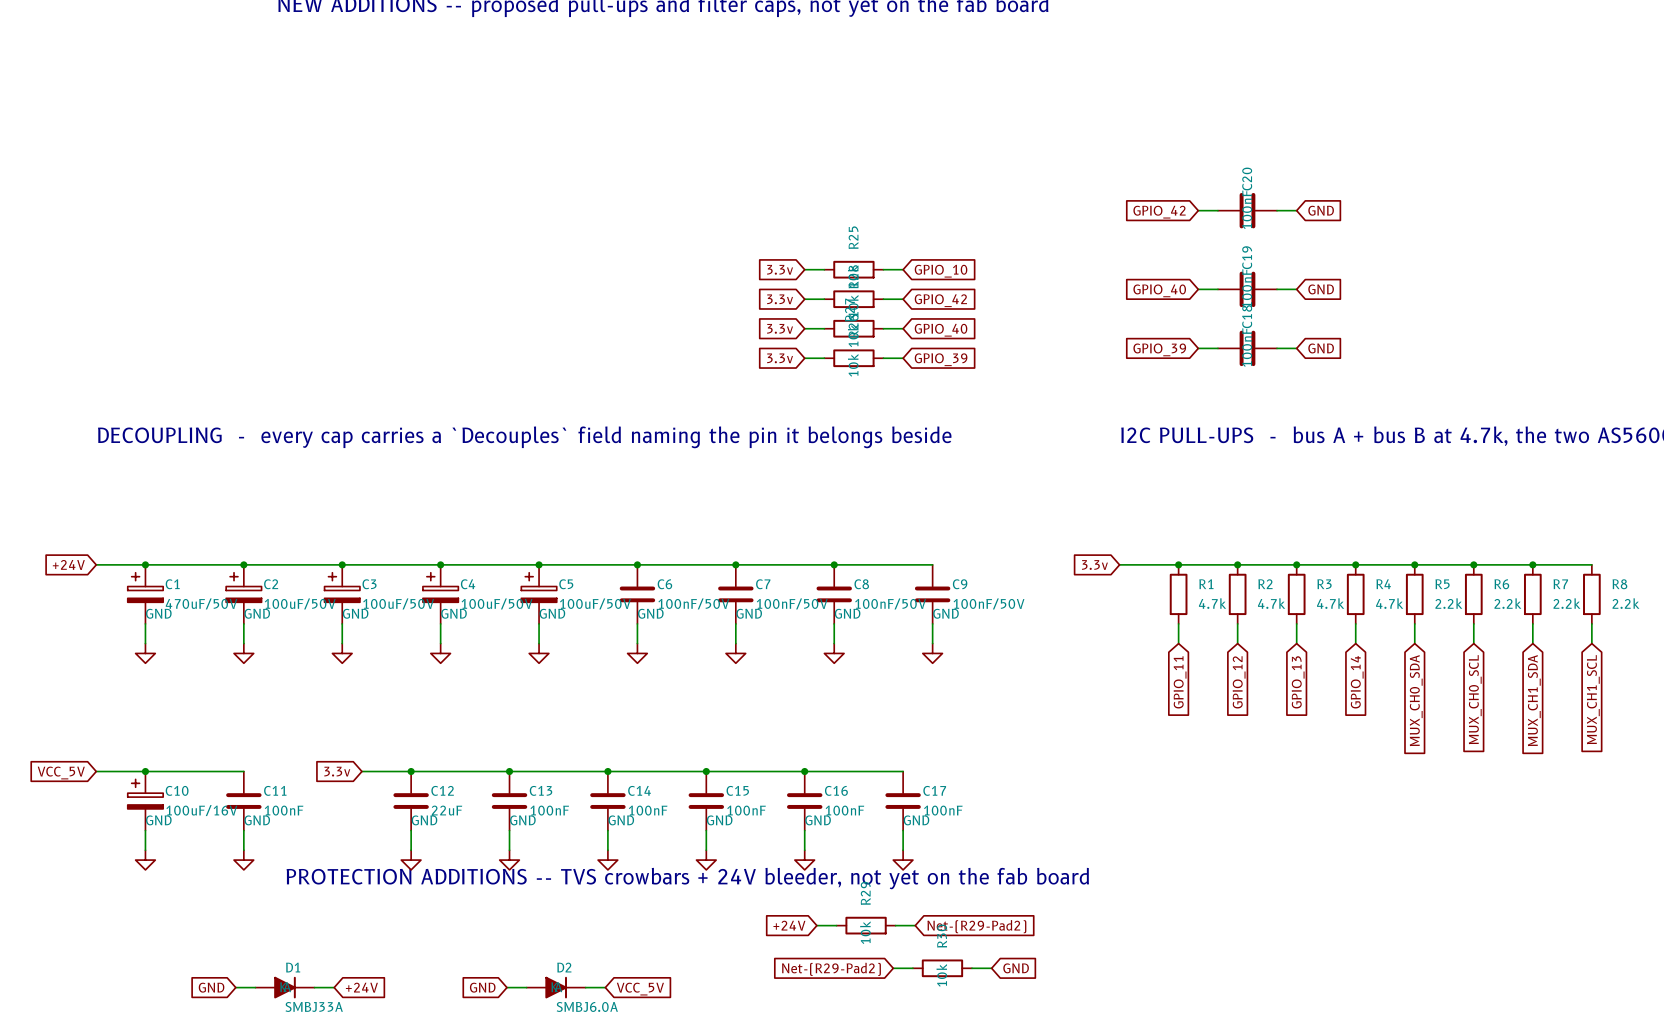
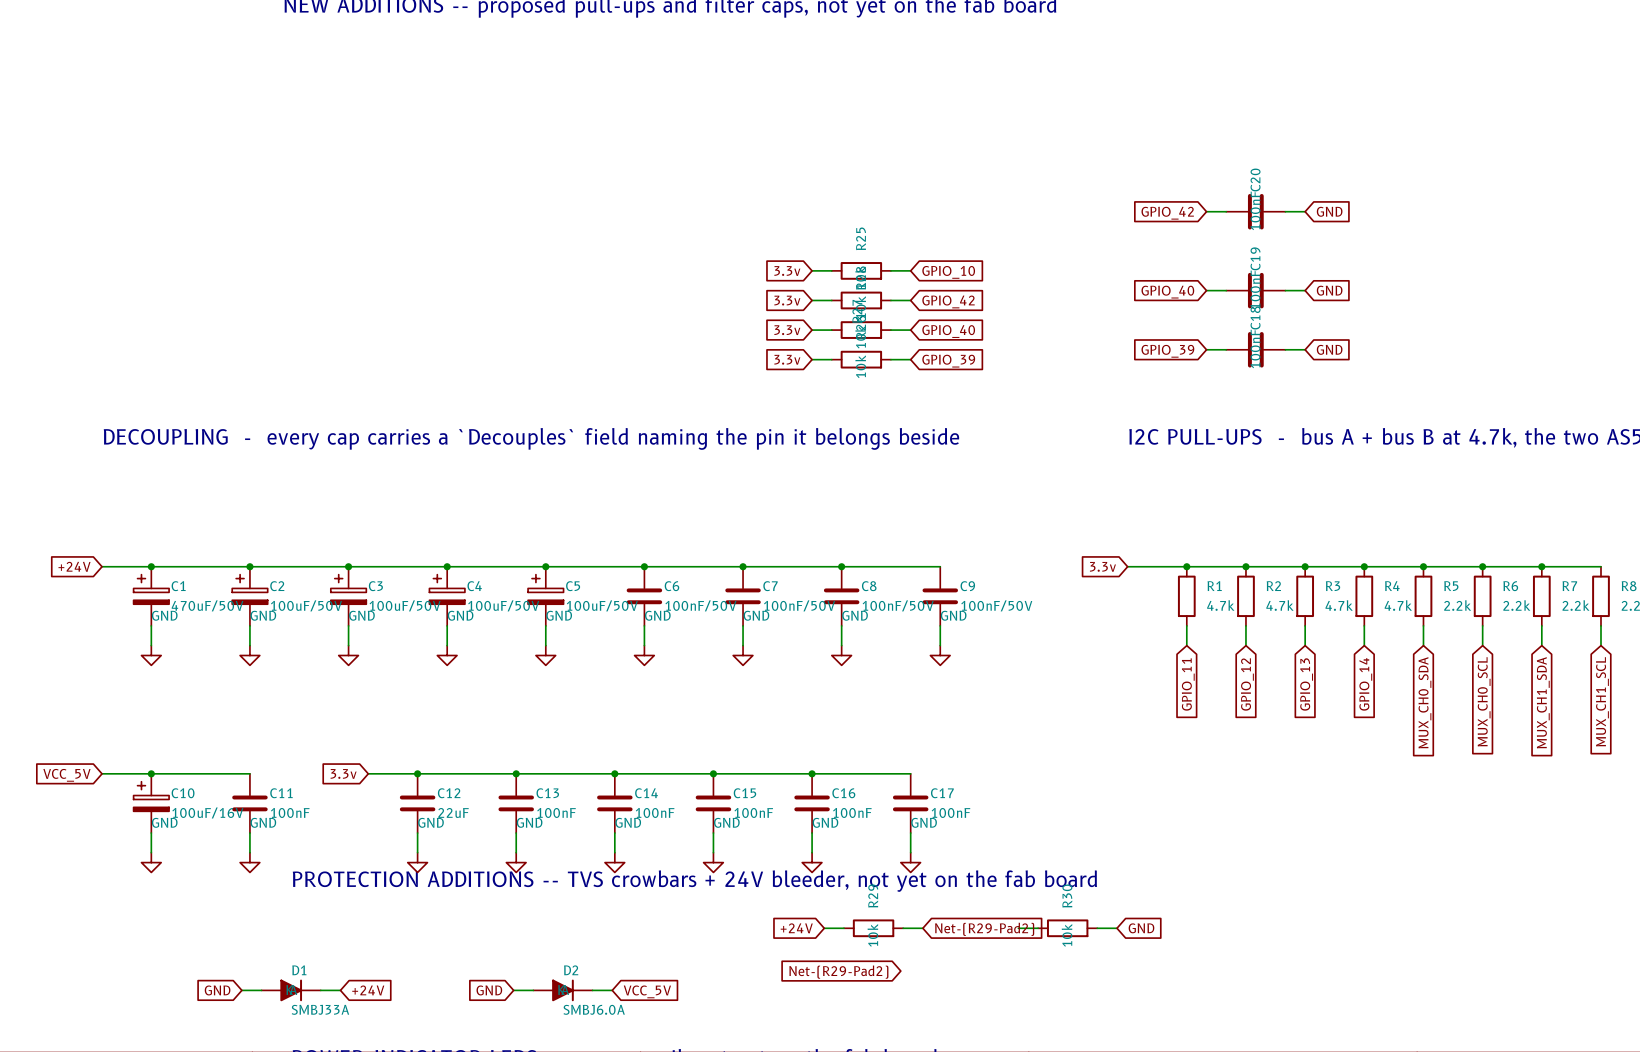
wire: (893, 968) (912, 968) -> (1018, 928) (1038, 928)
R30 position: (942, 968) -> (1067, 928)
wire: (971, 968) (991, 968) -> (1097, 928) (1117, 928)
global label position: GND (1016, 968) -> GND (1141, 928)

